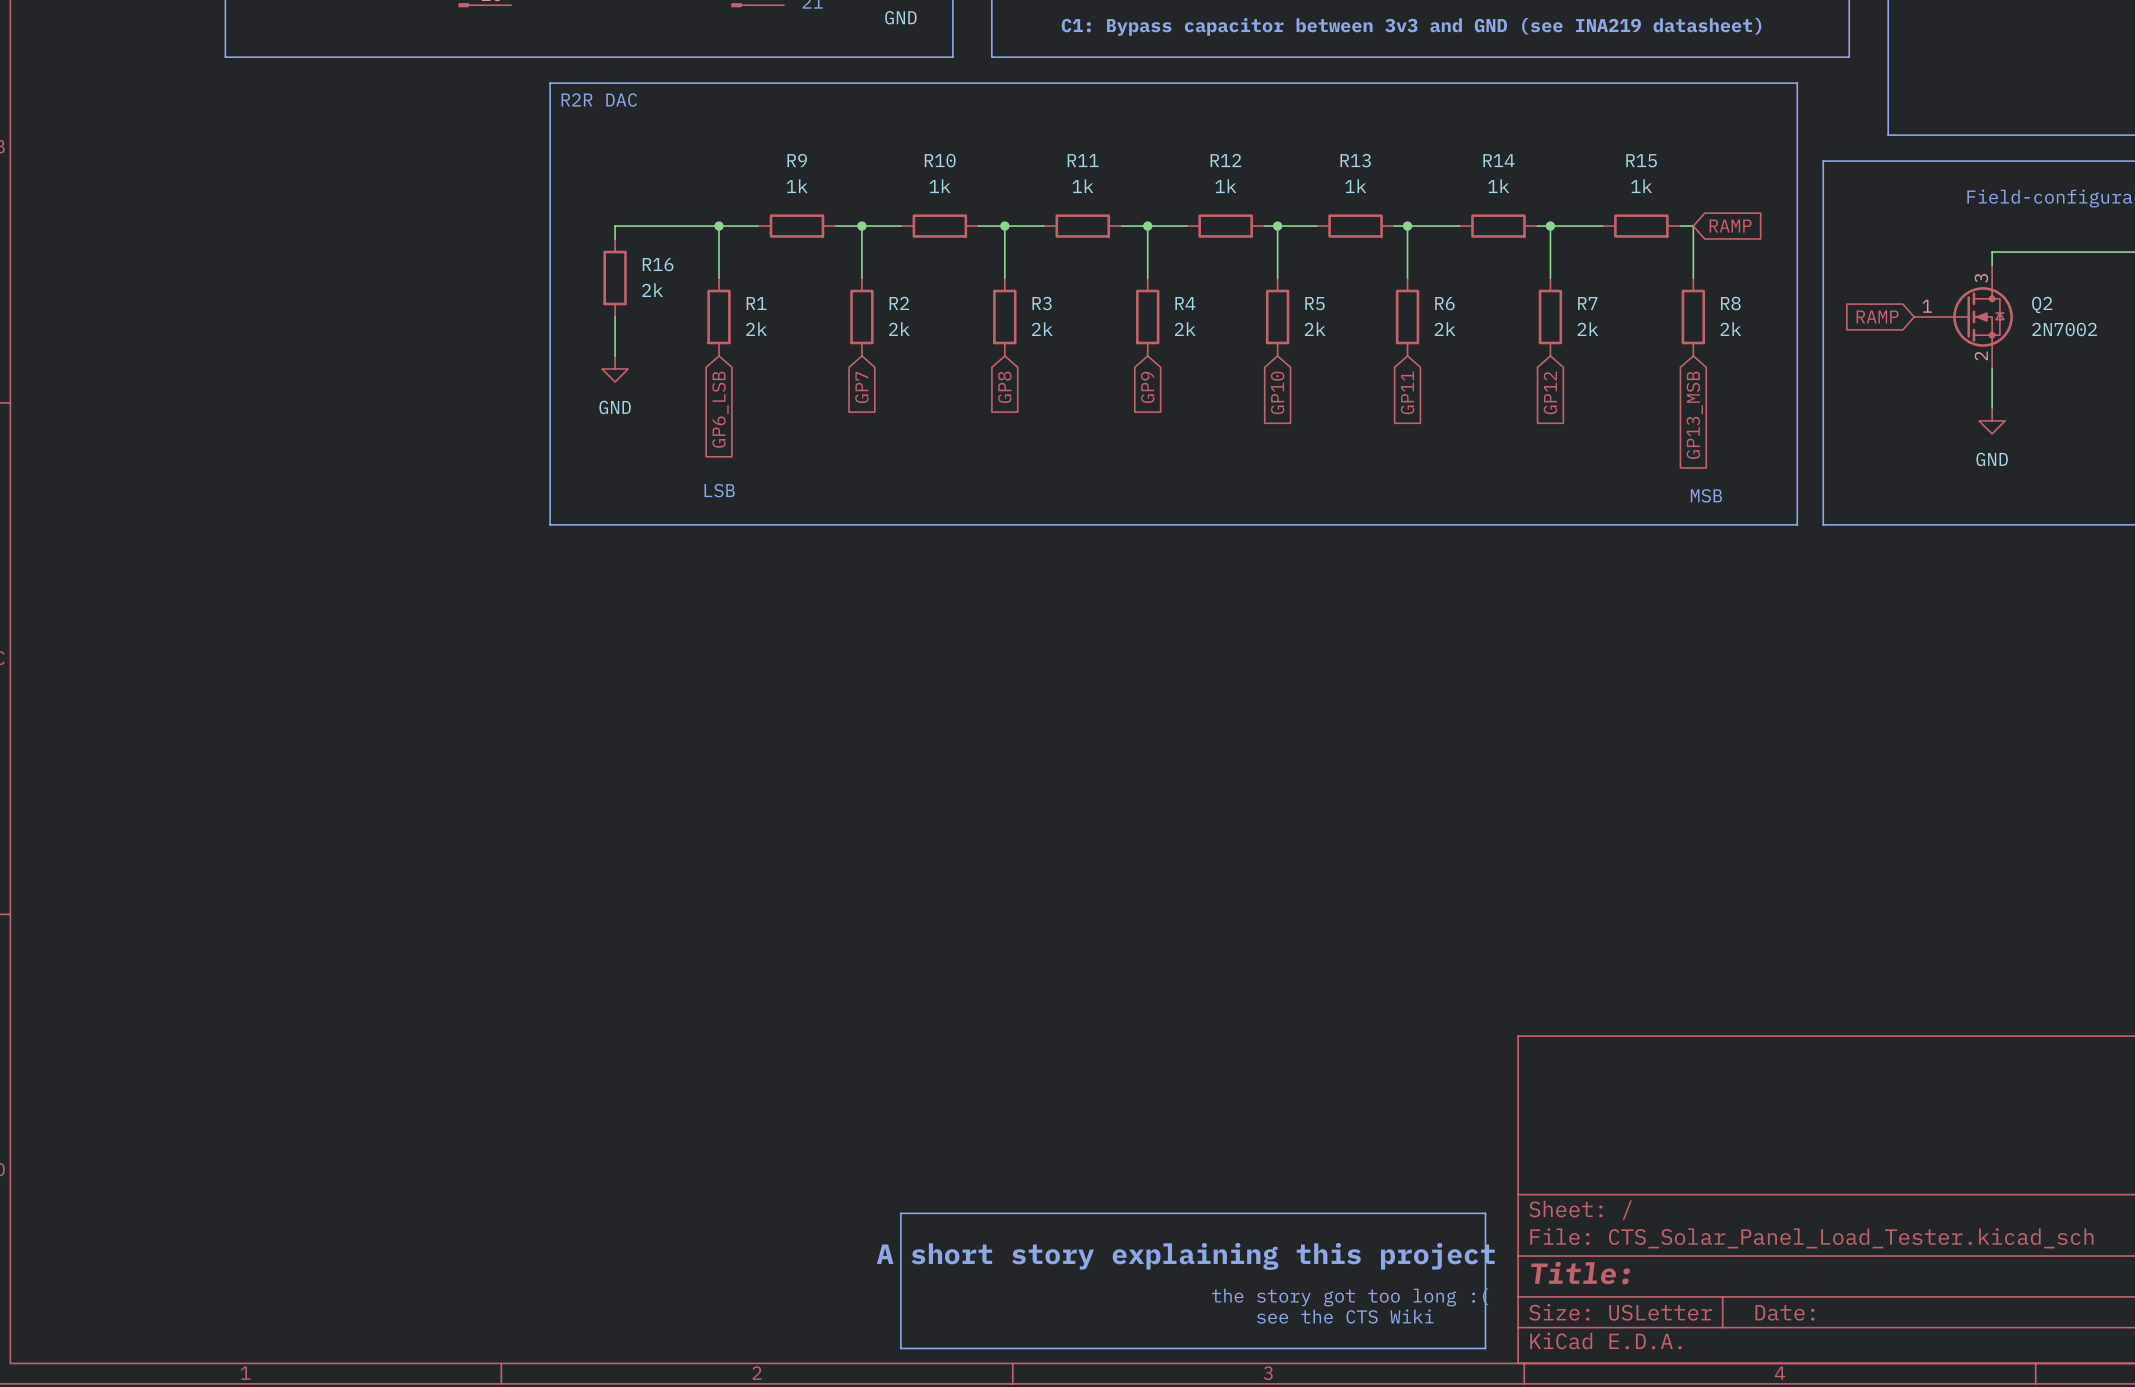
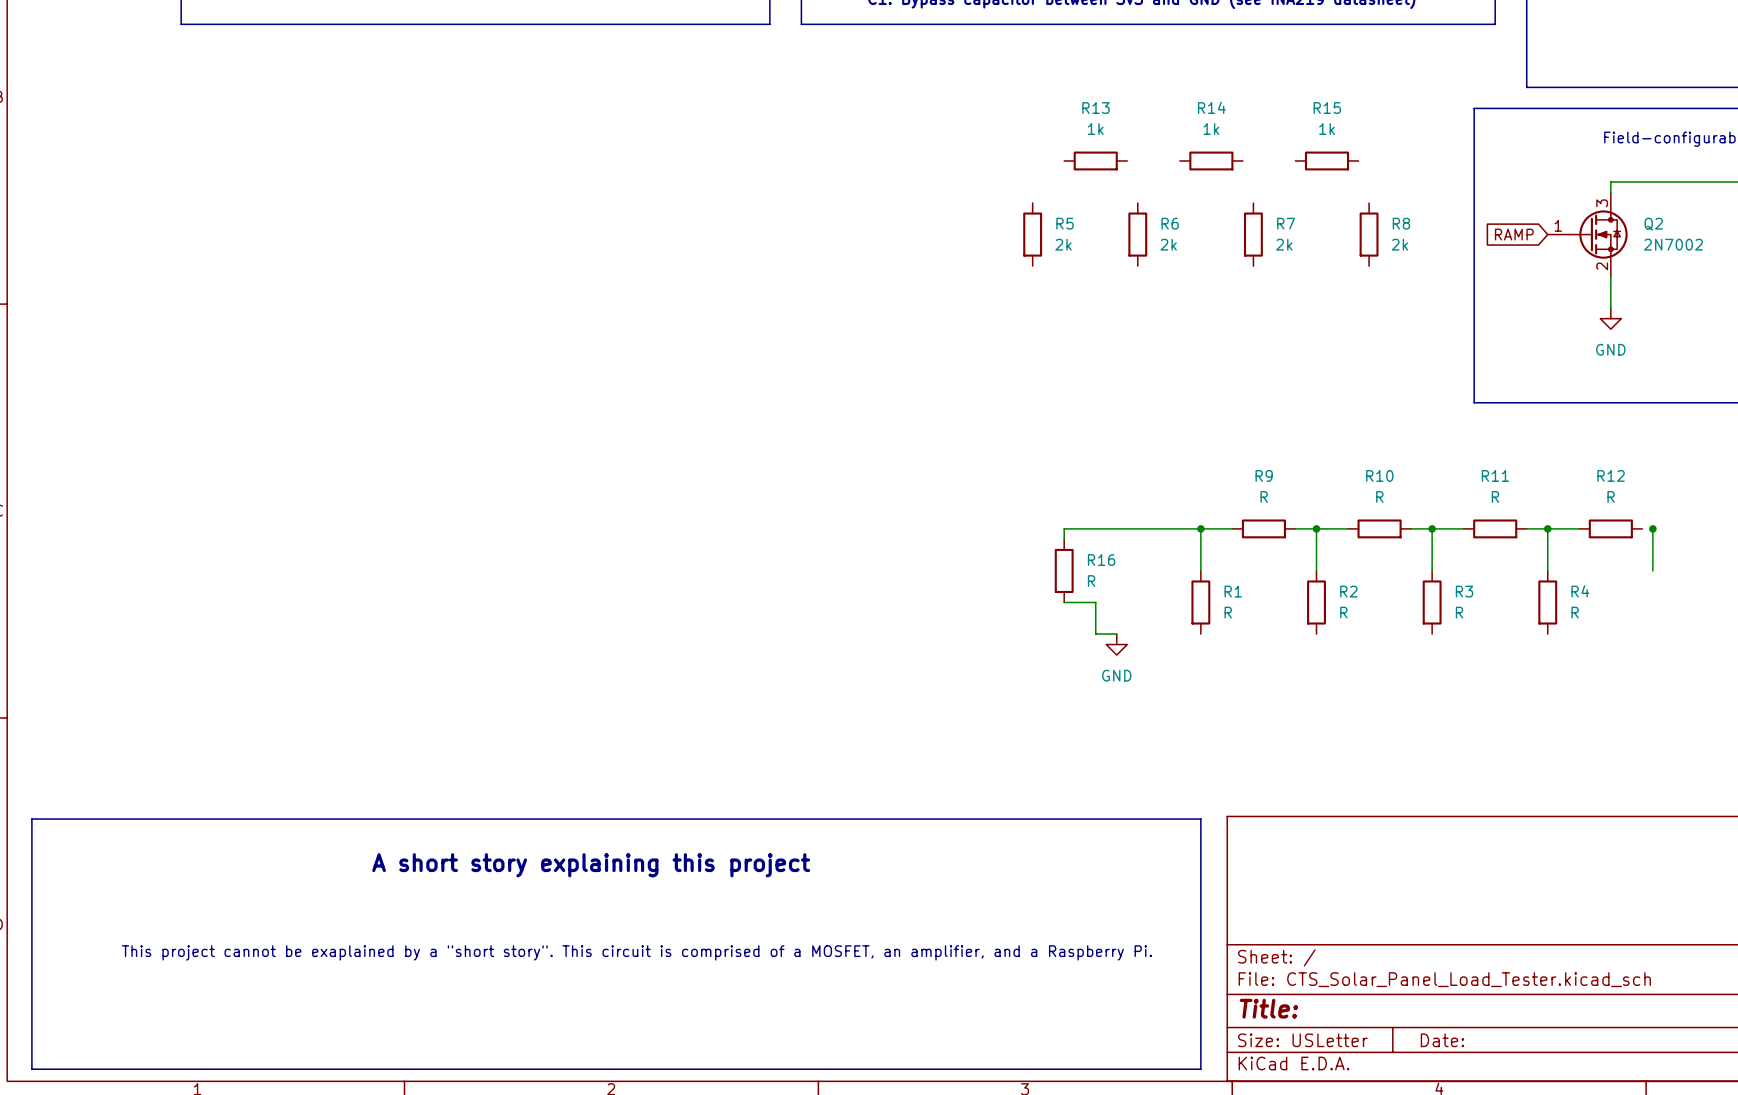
line: (550, 83) (1797, 83) (1797, 524) (550, 524) (550, 83) -> none
text: R2R DAC (599, 100) -> none
R9 value: 1k (797, 186) -> R (1264, 496)
R10 value: 1k (940, 186) -> R (1379, 496)
R11 value: 1k (1083, 186) -> R (1495, 496)
R12 value: 1k (1225, 186) -> R (1611, 496)
wire: (719, 226) (719, 278) -> none
junction: (719, 226) -> none
wire: (757, 226) (615, 226) (615, 239) -> none
R9 position: (796, 226) -> (1263, 528)
wire: (835, 226) (900, 226) -> none
wire: (861, 226) (861, 278) -> none
junction: (861, 226) -> none
R10 position: (939, 226) -> (1379, 528)
wire: (978, 226) (1043, 226) -> none
wire: (1004, 226) (1004, 278) -> none
junction: (1004, 226) -> none
R11 position: (1082, 226) -> (1495, 528)
wire: (1121, 226) (1186, 226) -> none
wire: (1147, 226) (1147, 278) -> none
junction: (1147, 226) -> none
R12 position: (1225, 226) -> (1610, 528)
wire: (1264, 226) (1316, 226) -> none
wire: (1277, 226) (1277, 278) -> none
junction: (1277, 226) -> none
wire: (1394, 226) (1459, 226) -> none
wire: (1407, 226) (1407, 278) -> none
junction: (1407, 226) -> none
wire: (1537, 226) (1602, 226) -> none
wire: (1550, 226) (1550, 278) -> none
junction: (1550, 226) -> none
wire: (1680, 226) (1693, 226) (1693, 278) -> none
global label: RAMP (1730, 226) -> none
R16 position: (615, 278) -> (1064, 570)
R16 value: 2k (652, 290) -> R (1091, 581)
wire: (615, 316) (615, 355) -> none
R1 position: (719, 316) -> (1200, 602)
R2 position: (861, 316) -> (1316, 602)
R3 position: (1004, 316) -> (1432, 602)
R4 position: (1147, 316) -> (1547, 602)
R1 value: 2k (756, 329) -> R (1228, 612)
R2 value: 2k (899, 329) -> R (1343, 612)
R3 value: 2k (1042, 329) -> R (1459, 612)
R4 value: 2k (1185, 329) -> R (1575, 612)
power symbol: GND (615, 368) -> none
global label: GP7 (861, 387) -> none
global label: GP8 (1004, 387) -> none
global label: GP9 (1147, 387) -> none
global label: GP10 (1277, 392) -> none
global label: GP11 (1407, 392) -> none
global label: GP12 (1550, 392) -> none
global label: GP6_LSB (720, 409) -> none
global label: GP13_MSB (1694, 415) -> none
text: LSB (719, 490) -> none
text: MSB (1706, 495) -> none
wire: none -> (1200, 528) (1200, 570)
junction: none -> (1200, 528)
wire: none -> (1232, 528) (1064, 528) (1064, 539)
wire: none -> (1295, 528) (1348, 528)
wire: none -> (1316, 528) (1316, 570)
junction: none -> (1316, 528)
wire: none -> (1411, 528) (1463, 528)
wire: none -> (1432, 528) (1432, 570)
junction: none -> (1432, 528)
wire: none -> (1526, 528) (1579, 528)
wire: none -> (1547, 528) (1547, 570)
junction: none -> (1547, 528)
wire: none -> (1652, 528) (1652, 570)
junction: none -> (1652, 528)
wire: none -> (1064, 602) (1095, 602) (1095, 634) (1116, 634)
power symbol: none -> GND (1116, 644)
text: none -> A short story explaining this project (591, 865)
text: none -> This project cannot be exaplained by a "short story". This circuit is comprised of a MOSFET, an amplifier, and a Raspberry Pi. (636, 952)
line: (1485, 1213) (900, 1213) (900, 1348) -> (1200, 959) (1200, 819) (31, 819) (31, 1069) (727, 1069)
text: A short story explaining this project (1185, 1256) -> none
text: the story got too long :( (1350, 1297) -> none
text: see the CTS Wiki (1345, 1316) -> none

